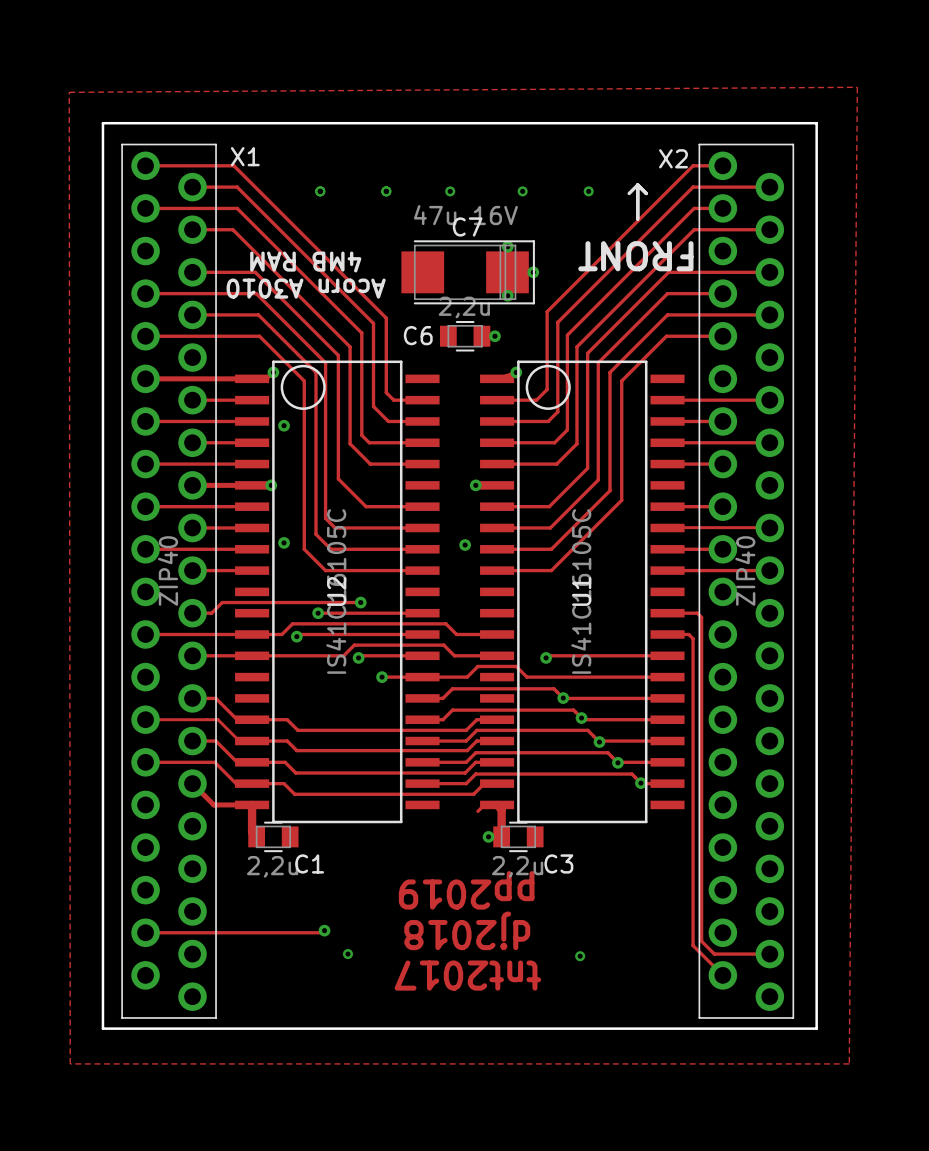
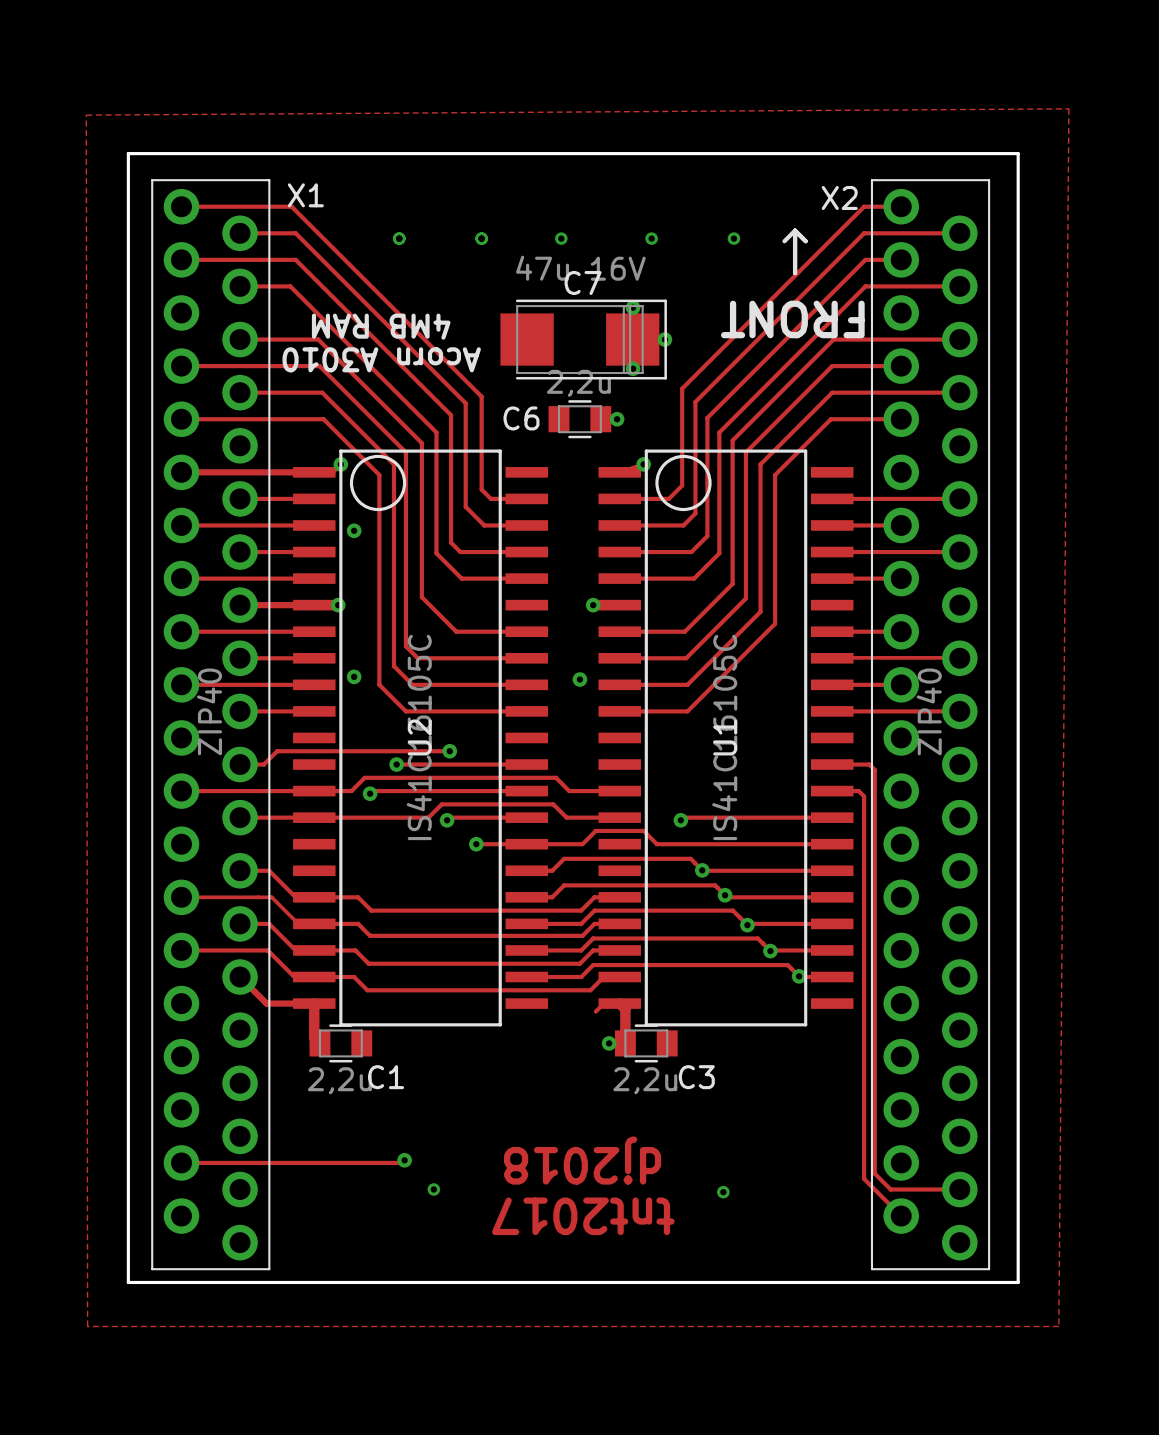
text: pp2019 (466, 890) -> none

